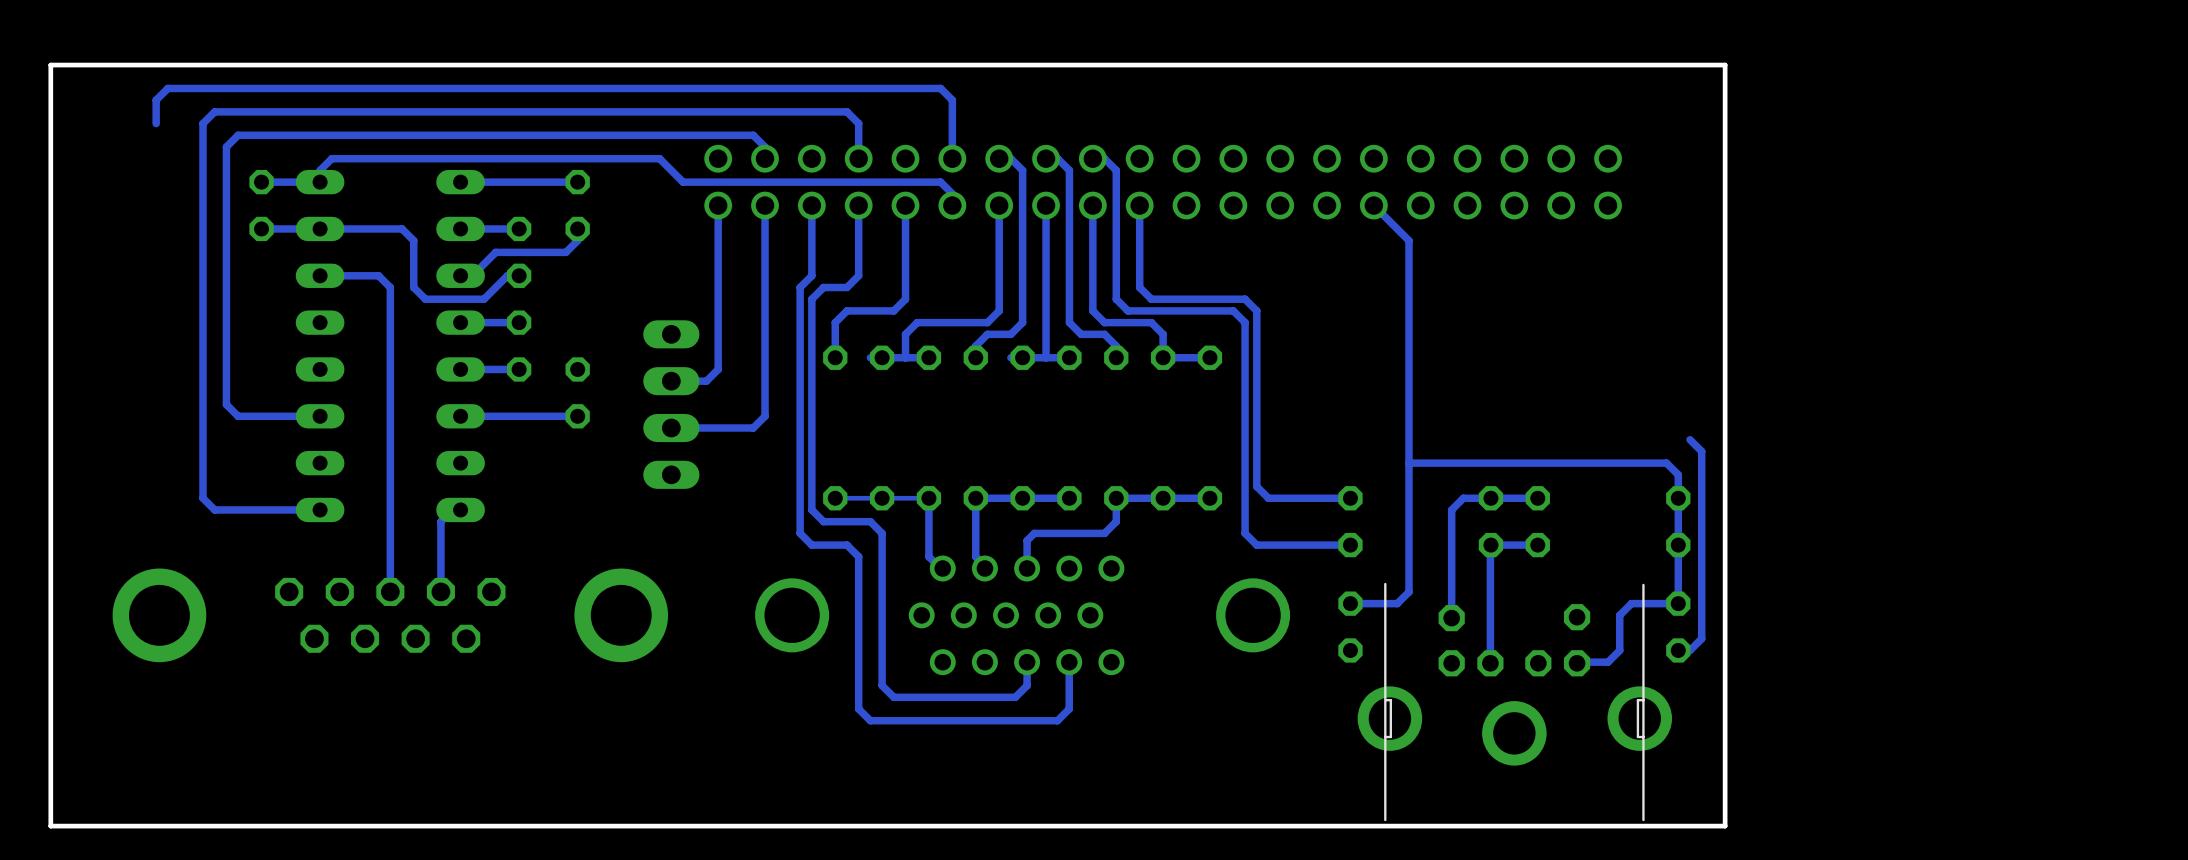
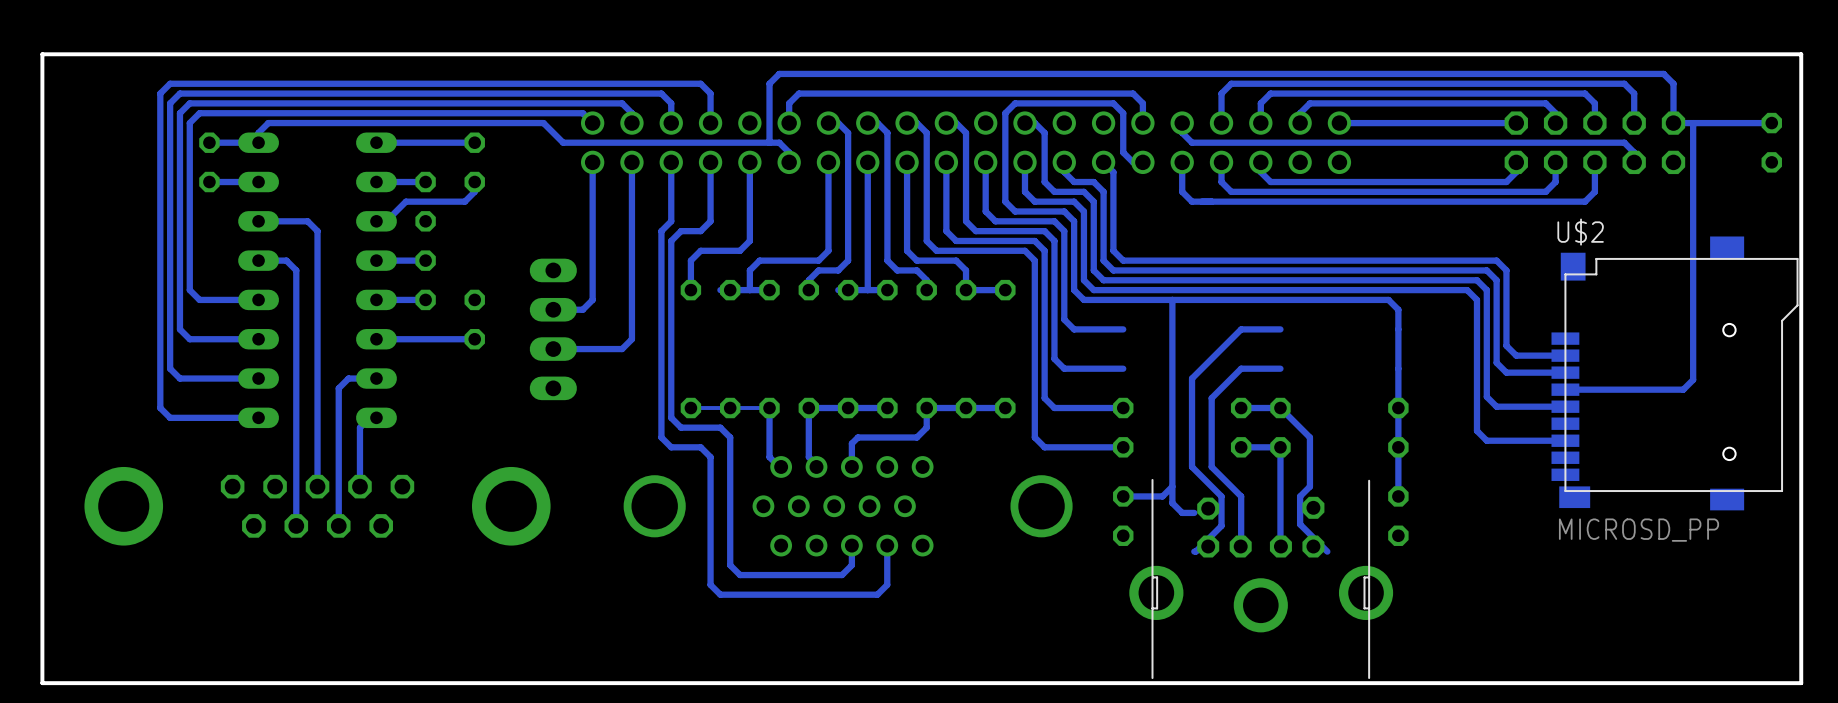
bottom track: (156, 123) (156, 100) (167, 88) (940, 88) (952, 100) (952, 135) -> (1142, 123) (1142, 103) (1133, 93) (798, 93) (789, 103)
bottom track: none -> (592, 123) (582, 113) (199, 113) (189, 123) (189, 290) (199, 299) (258, 299)
bottom track: none -> (671, 123) (671, 103) (661, 93) (179, 93) (170, 103) (170, 368) (179, 378) (258, 378)
bottom track: none -> (946, 123) (956, 123) (966, 132) (966, 221) (975, 231) (1044, 231) (1054, 240) (1054, 358) (1064, 368) (1123, 368)
bottom track: none -> (1024, 123) (1034, 123) (1044, 132) (1044, 182) (1054, 191) (1083, 191) (1093, 201) (1093, 270) (1103, 280) (1476, 280) (1486, 290) (1486, 396) (1496, 406) (1565, 406)
bottom track: none -> (1182, 123) (1182, 132) (1192, 142) (1624, 142) (1634, 152) (1634, 162)
bottom track: none -> (1221, 123) (1221, 93) (1231, 83) (1624, 83) (1634, 93) (1634, 123)
bottom track: none -> (1260, 123) (1260, 103) (1270, 93) (1585, 93) (1594, 103) (1594, 123)
bottom track: none -> (1300, 123) (1300, 113) (1309, 103) (1545, 103) (1555, 113) (1555, 123)
bottom track: none -> (1516, 123) (1339, 123)
bottom track: none -> (1693, 123) (1693, 379) (1683, 389) (1565, 389)
bottom track: none -> (1771, 123) (1673, 123) (1673, 83) (1663, 73) (779, 73) (769, 83) (769, 142)
part: none -> (1594, 142)
part: none -> (1771, 142)
bottom track: none -> (985, 162) (985, 211) (995, 221) (1054, 221) (1064, 231) (1064, 319) (1074, 329) (1123, 329)
bottom track: none -> (1024, 162) (1024, 191) (1034, 201) (1074, 201) (1083, 211) (1083, 280) (1093, 290) (1467, 290) (1476, 299) (1476, 430) (1486, 440) (1565, 440)
bottom track: none -> (1064, 162) (1064, 172) (1074, 182) (1093, 182) (1103, 191) (1103, 260) (1113, 270) (1486, 270) (1496, 280) (1496, 362) (1506, 372) (1565, 372)
bottom track: none -> (1103, 162) (1113, 172) (1113, 250) (1123, 260) (1496, 260) (1506, 270) (1506, 345) (1516, 355) (1565, 355)
bottom track: (1373, 205) (1408, 240) (1408, 369) -> none
bottom track: none -> (1182, 162) (1182, 191) (1192, 201) (1585, 201) (1594, 191) (1594, 162)
bottom track: none -> (1221, 162) (1221, 182) (1231, 191) (1545, 191) (1555, 182) (1555, 162)
bottom track: none -> (1260, 162) (1260, 172) (1270, 182) (1506, 182) (1516, 172) (1516, 162)
bottom track: (320, 228) (402, 228) (413, 240) (413, 287) (425, 299) (484, 299) (507, 275) (519, 275) -> none
bottom track: none -> (258, 260) (286, 260) (296, 270) (296, 525)
bottom track: none -> (1280, 329) (1241, 329) (1192, 378) (1192, 466) (1221, 496) (1221, 525) (1194, 551)
bottom track: (1690, 439) (1701, 451) (1701, 638) (1690, 650) (1678, 650) -> none
bottom track: none -> (1280, 368) (1241, 368) (1211, 398) (1211, 466) (1241, 496) (1240, 551)
U$2: none -> MICROSD_PP (1675, 373)
bottom track: none -> (376, 378) (348, 378) (338, 388) (338, 525)
bottom track: (1408, 463) (1666, 463) (1678, 474) -> (1142, 162) (1133, 162) (1123, 152) (1123, 113) (1113, 103) (1015, 103) (1005, 113) (1005, 201) (1015, 211) (1064, 211) (1074, 221) (1074, 290) (1083, 299) (1388, 299) (1398, 309) (1398, 388)
bottom track: (1490, 498) (1463, 498) (1451, 509) (1451, 618) -> none
bottom track: none -> (1280, 408) (1309, 437) (1309, 486) (1300, 496) (1300, 524) (1327, 551)
bottom track: (1490, 545) (1490, 663) -> none
bottom track: none -> (1280, 447) (1280, 551)
bottom track: none -> (1172, 486) (1172, 503) (1182, 512) (1194, 512)
bottom track: (1678, 603) (1631, 603) (1619, 615) (1619, 650) (1608, 662) (1577, 663) -> none
board edge: (1725, 826) (1725, 65) (50, 65) (50, 826) (62, 826) -> (1437, 683) (1801, 683) (1801, 54) (42, 54) (42, 683)

